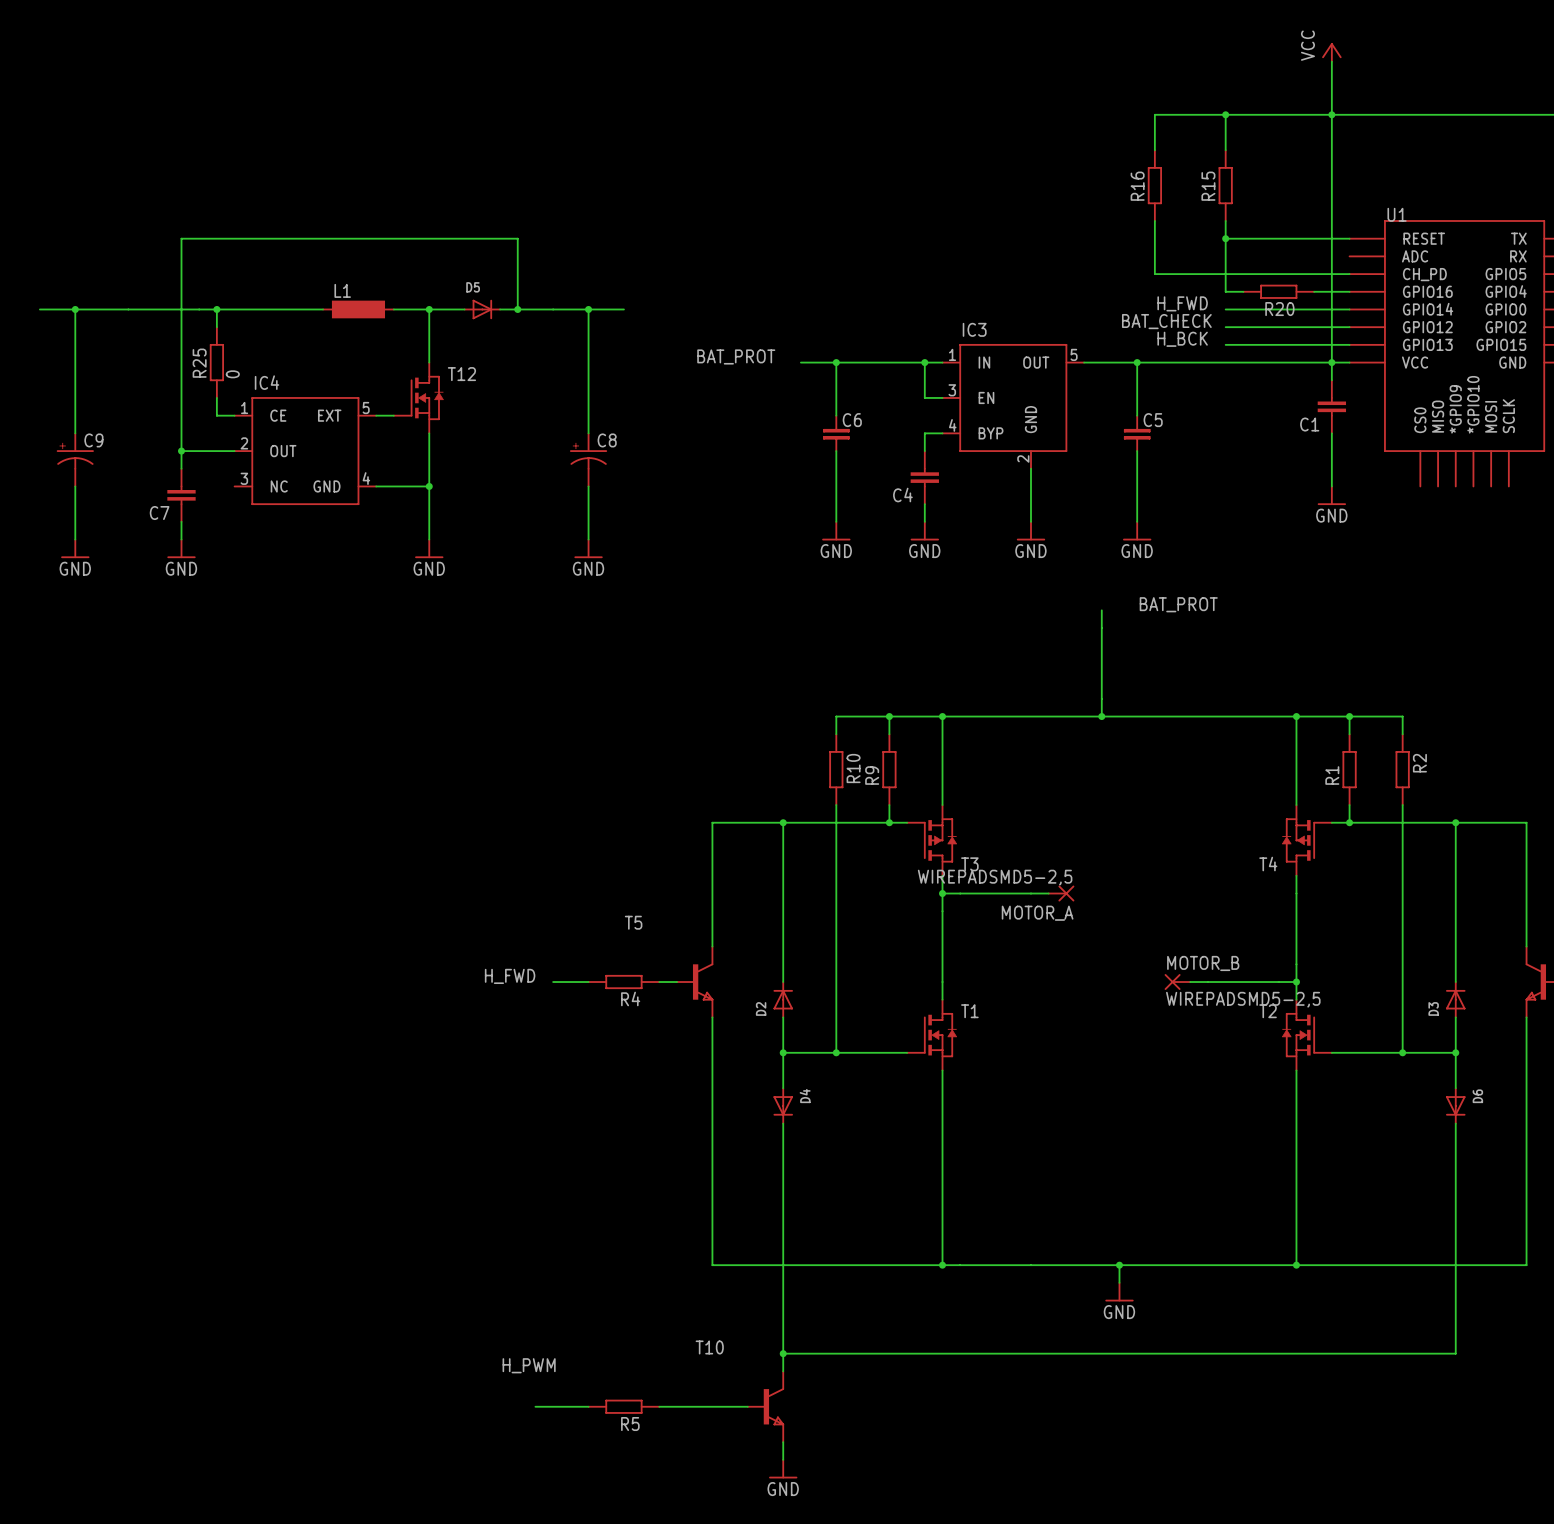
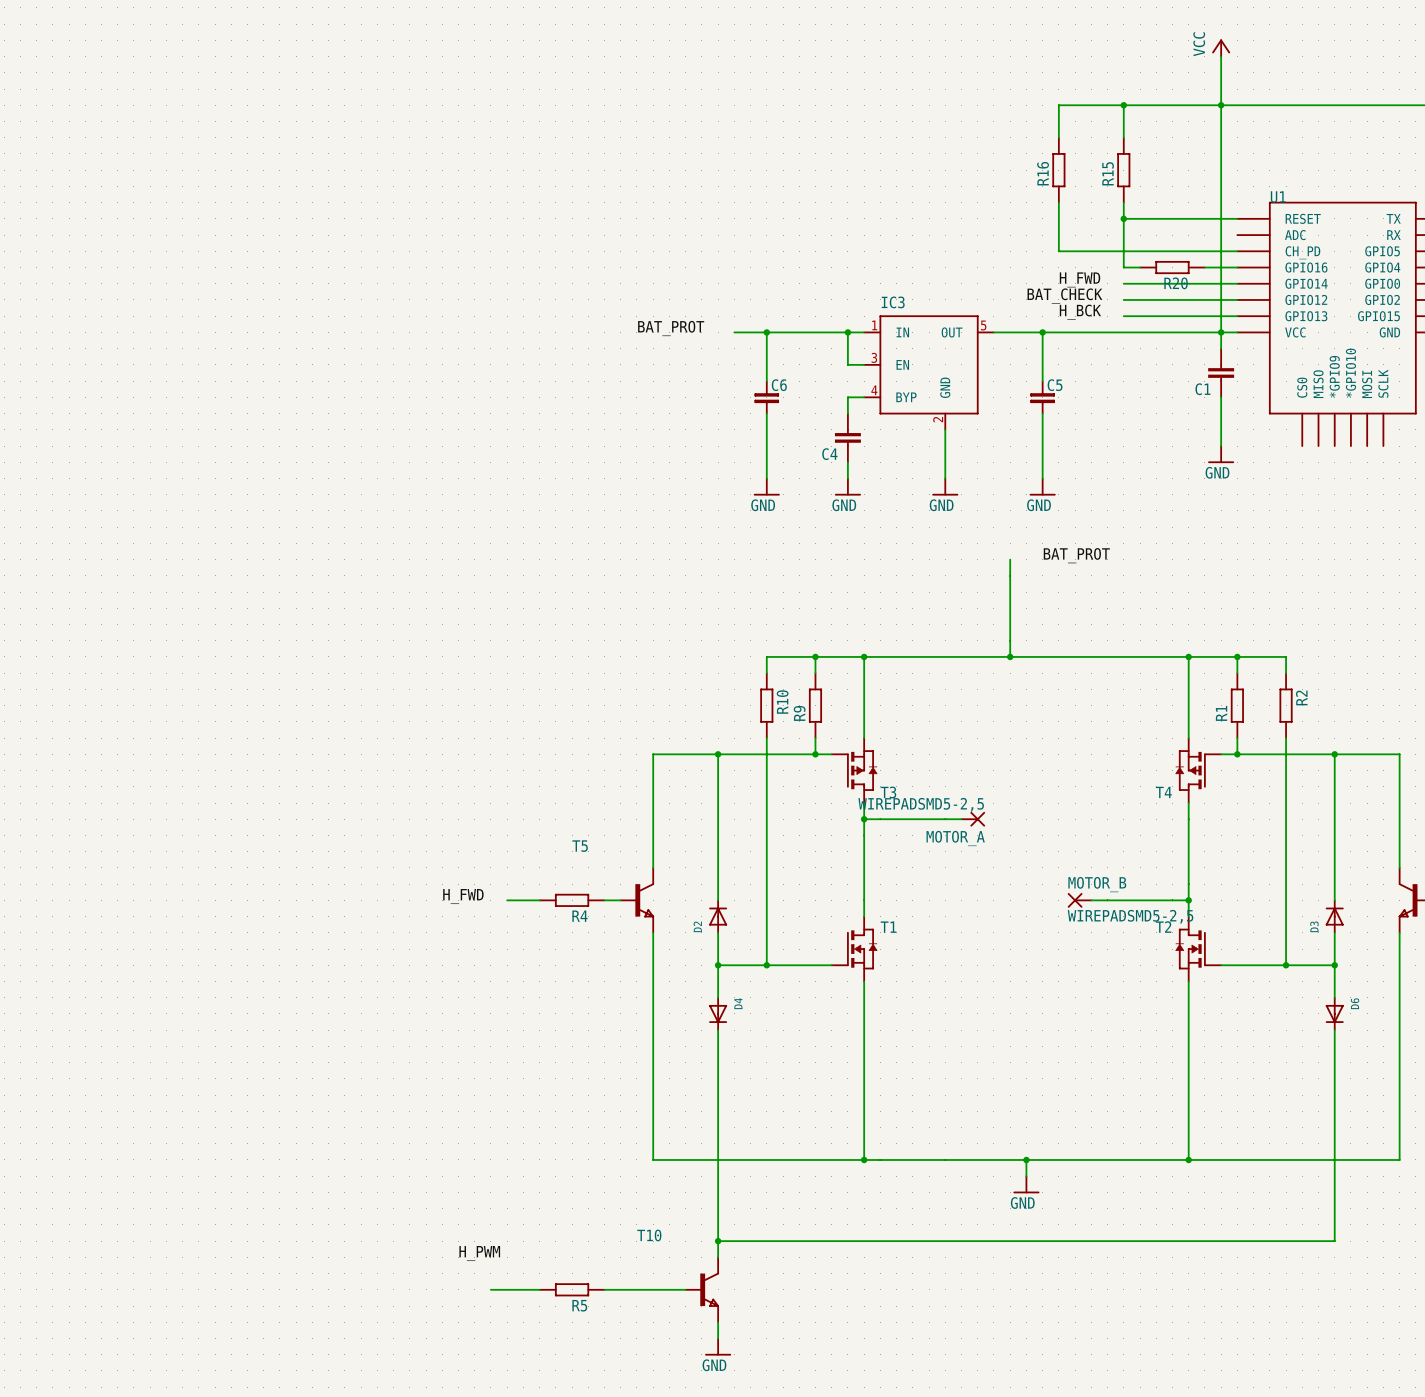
wire: (39, 309) (323, 309) -> none
wire: (75, 309) (75, 433) -> none
junction: (75, 309) -> none
wire: (216, 309) (216, 327) -> none
junction: (216, 309) -> none
L1: (358, 309) -> none
wire: (393, 309) (464, 309) -> none
wire: (429, 309) (429, 362) -> none
junction: (429, 309) -> none
D5: (482, 309) -> none
wire: (500, 309) (623, 309) -> none
wire: (517, 309) (517, 238) (181, 238) (181, 468) -> none
junction: (517, 309) -> none
wire: (588, 309) (588, 433) -> none
junction: (588, 309) -> none
R25: 0 (216, 362) -> none
wire: (216, 397) (216, 415) (234, 415) -> none
T12: (418, 397) -> none
wire: (376, 415) (393, 415) -> none
wire: (429, 433) (429, 539) -> none
wire: (181, 451) (234, 451) -> none
junction: (181, 451) -> none
IC4: (305, 451) -> none
C9: (75, 459) -> none
C8: (588, 459) -> none
wire: (75, 486) (75, 539) -> none
wire: (376, 486) (429, 486) -> none
junction: (429, 486) -> none
wire: (588, 486) (588, 539) -> none
C7: (181, 495) -> none
wire: (181, 521) (181, 539) -> none
power symbol: GND (75, 548) -> none
power symbol: GND (181, 548) -> none
power symbol: GND (429, 548) -> none
power symbol: GND (588, 548) -> none

